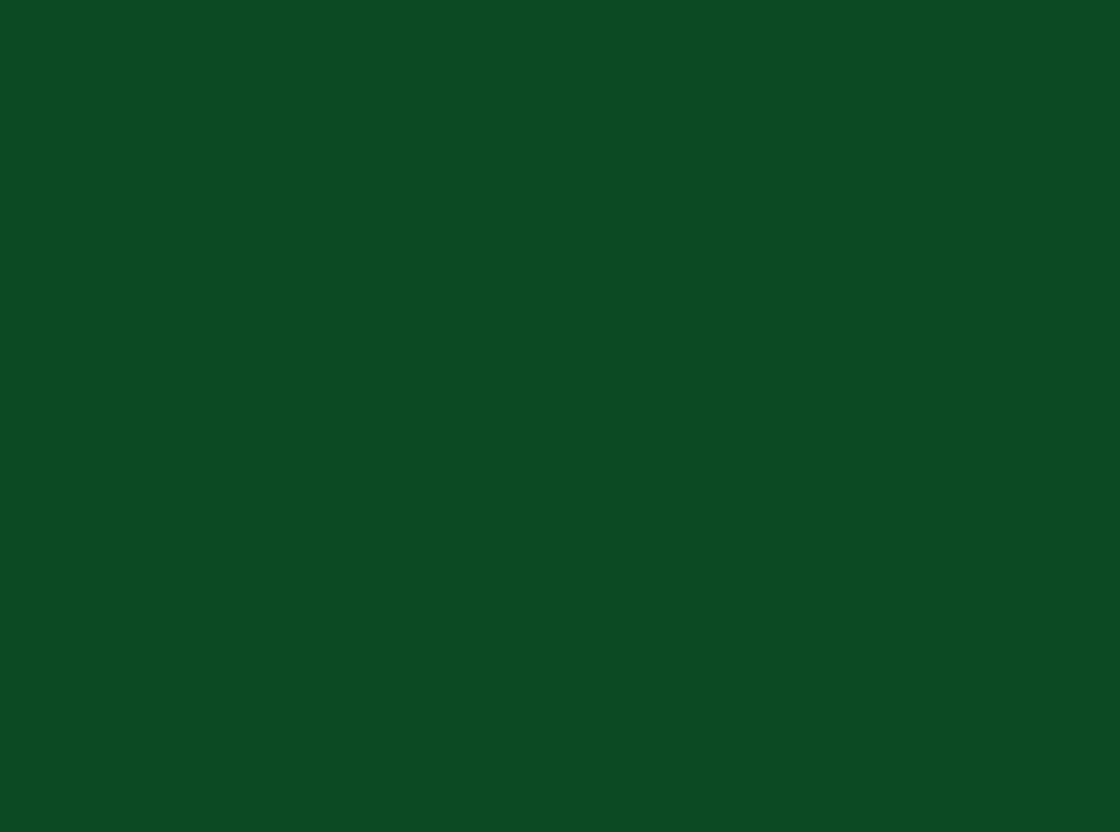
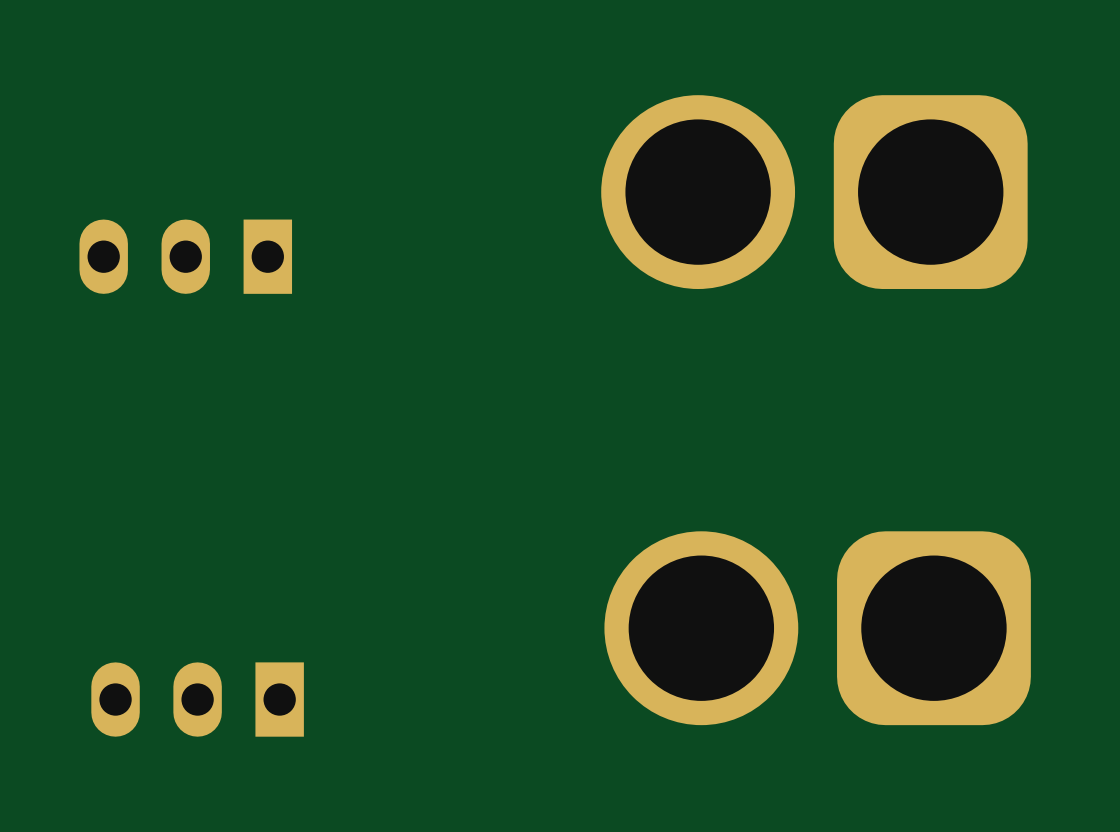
part: none -> (814, 192)
part: none -> (185, 256)
part: none -> (817, 628)
part: none -> (197, 699)

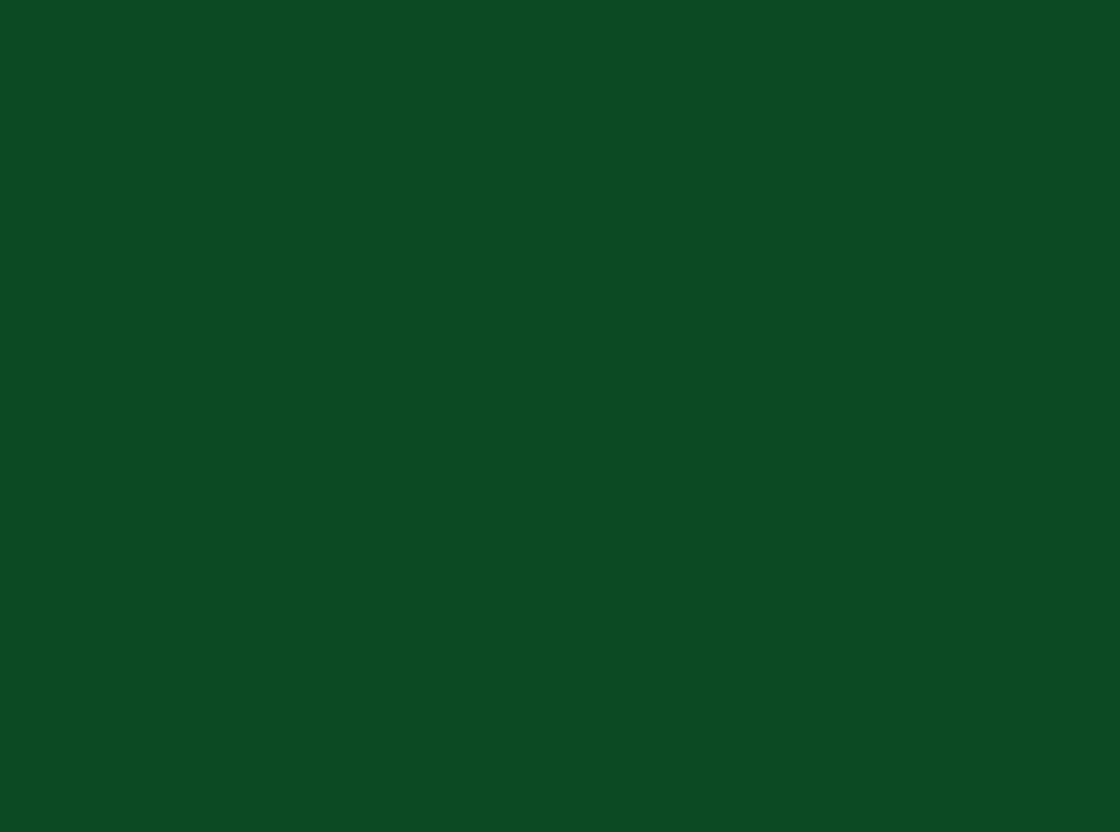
part: (814, 192) -> none
part: (185, 256) -> none
part: (817, 628) -> none
part: (197, 699) -> none

